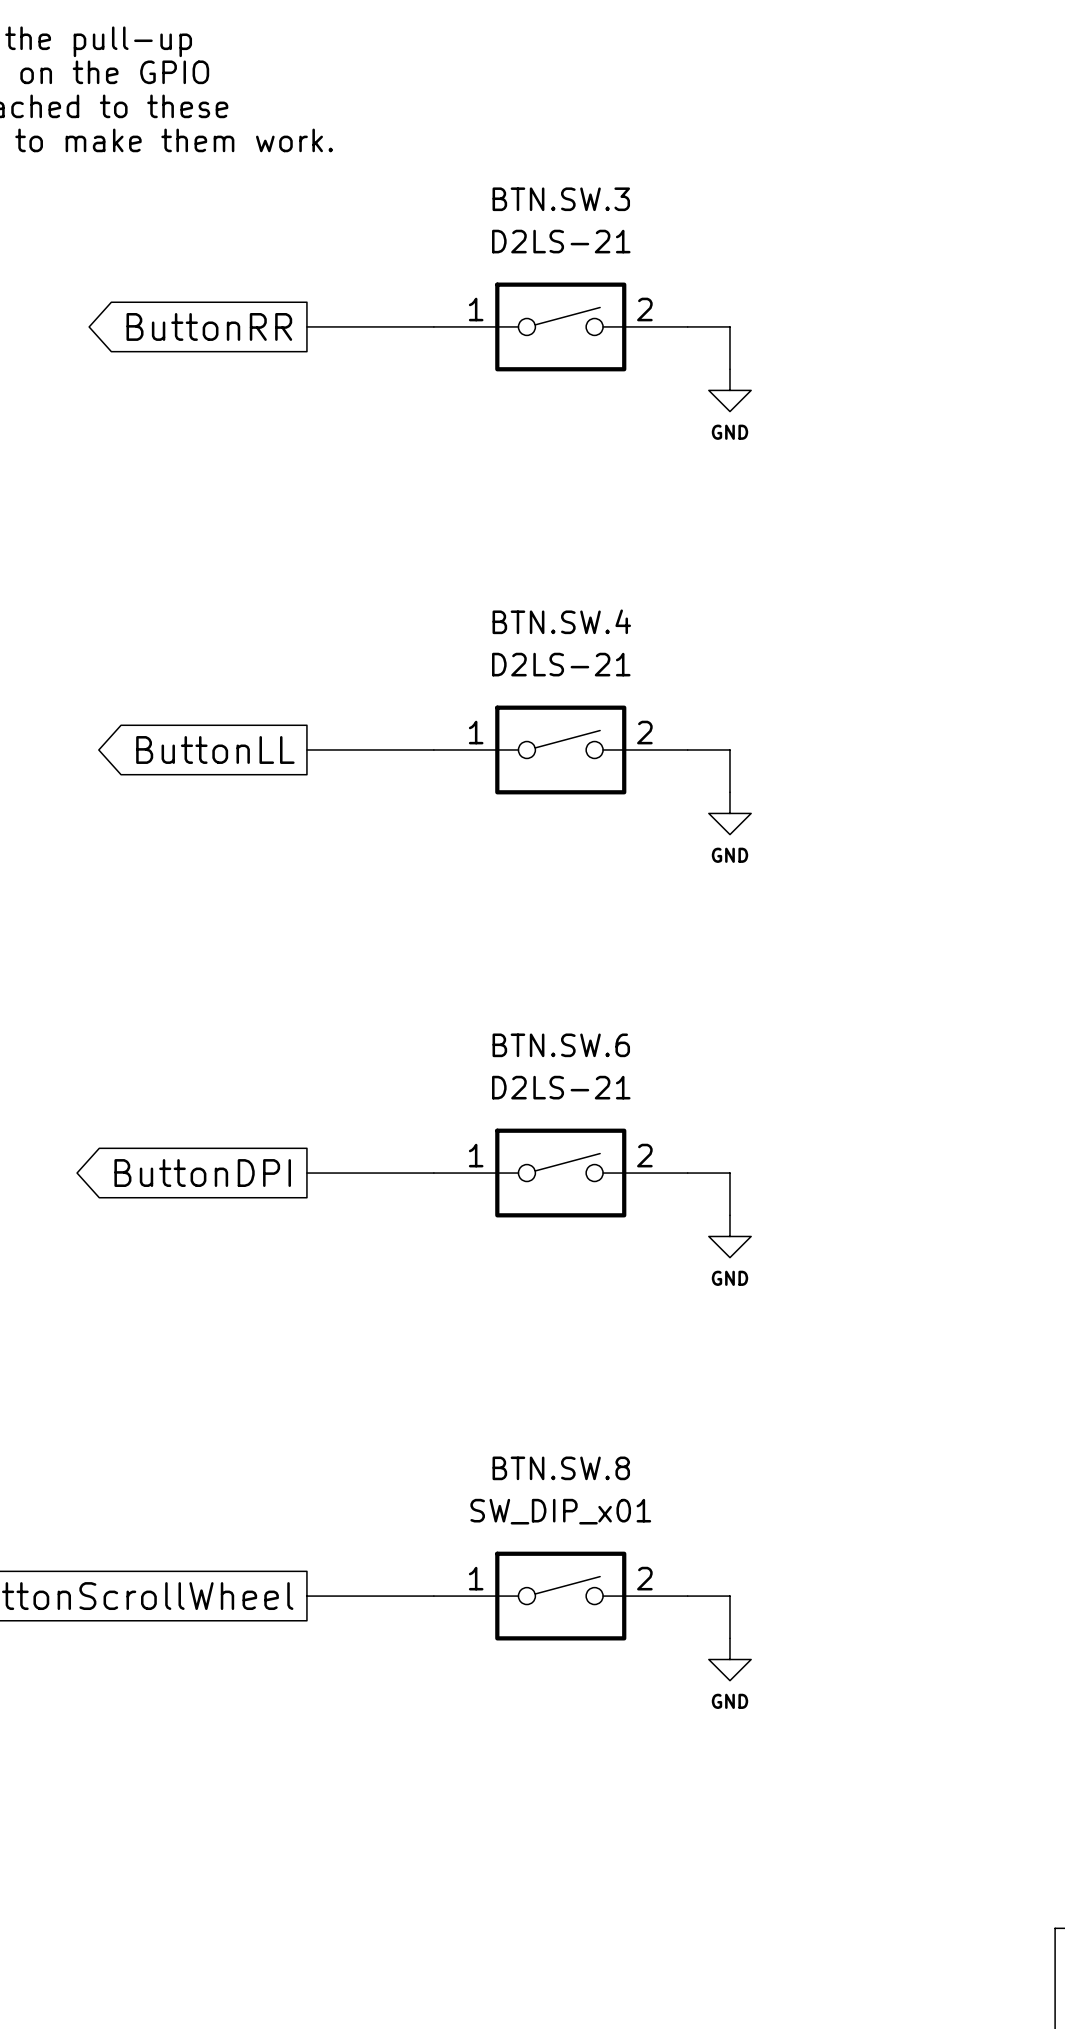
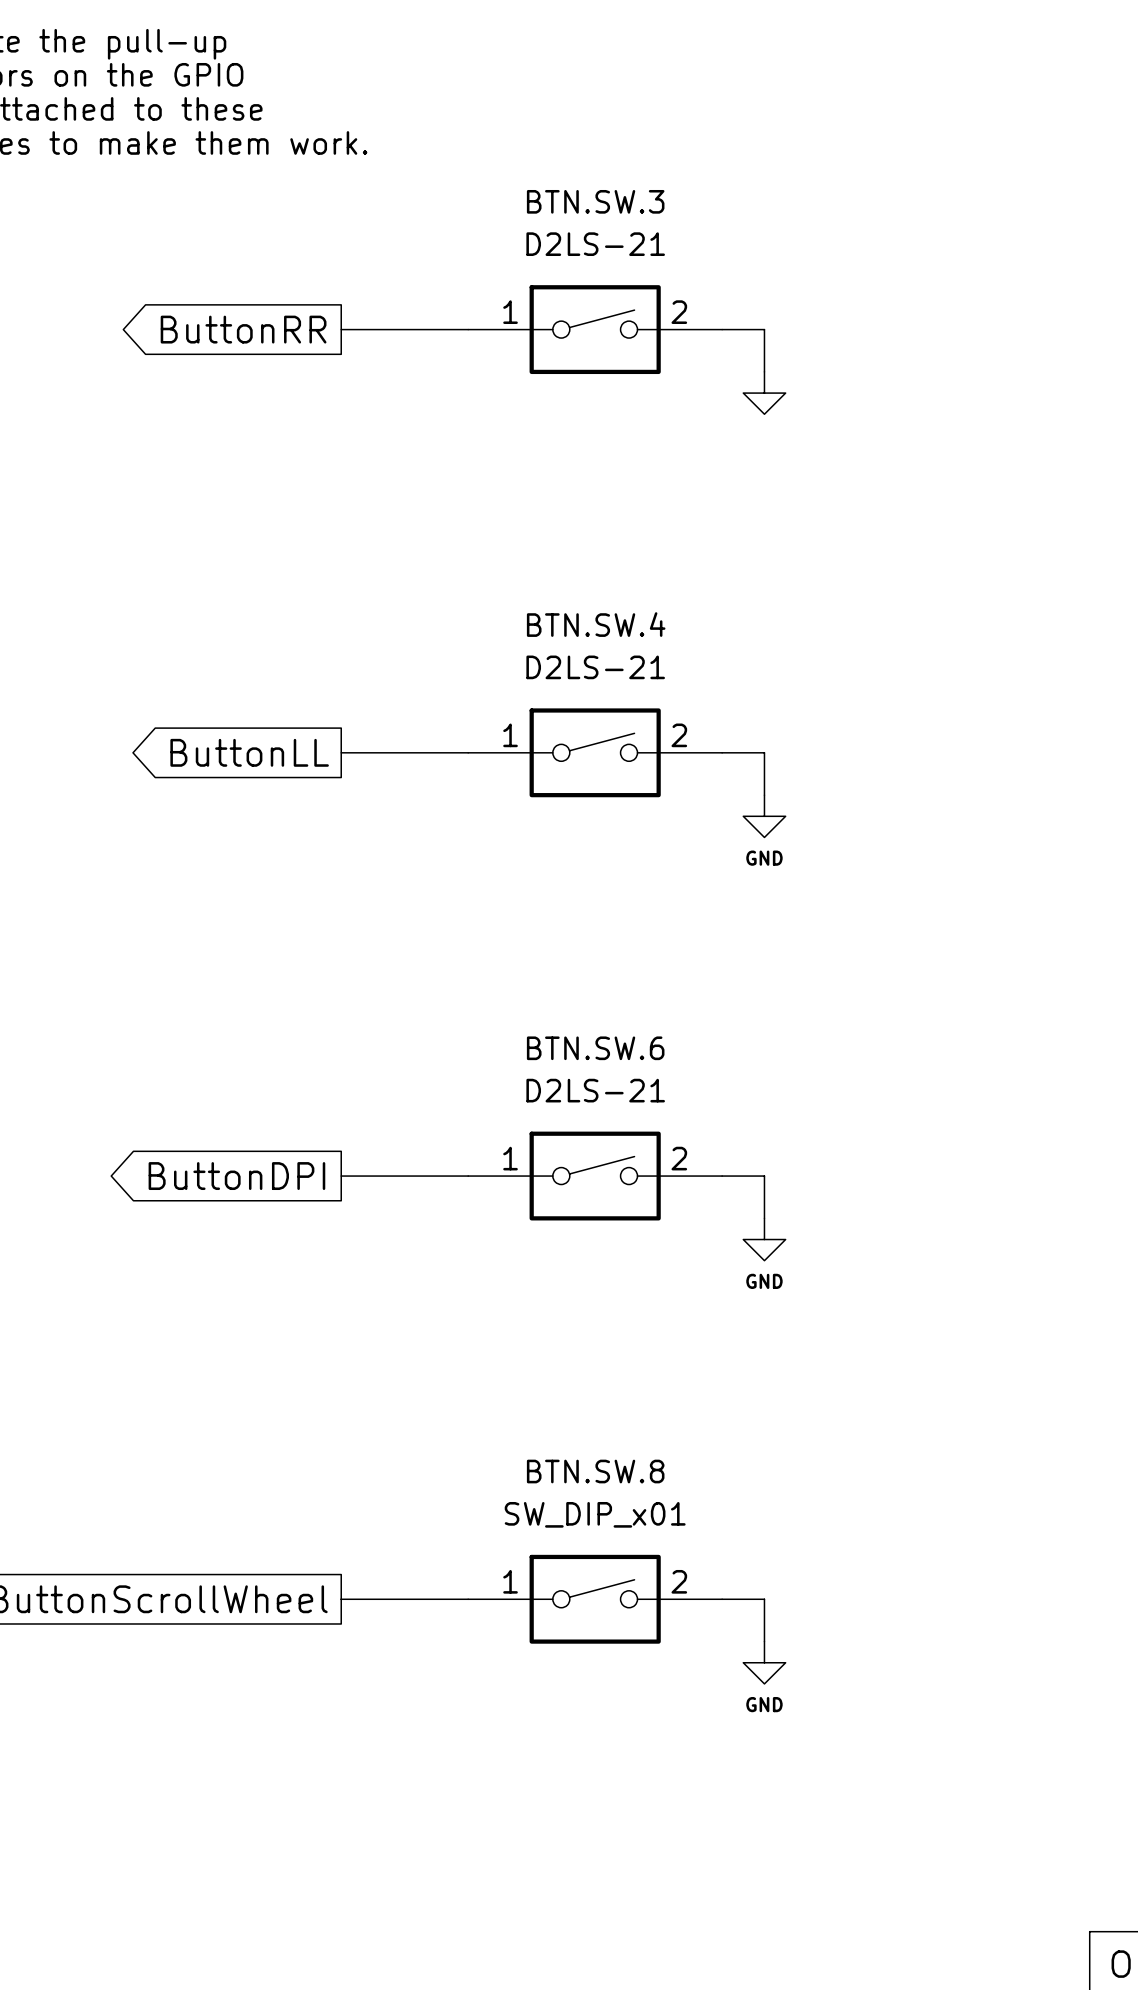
power symbol text: GND (729, 432) -> none

